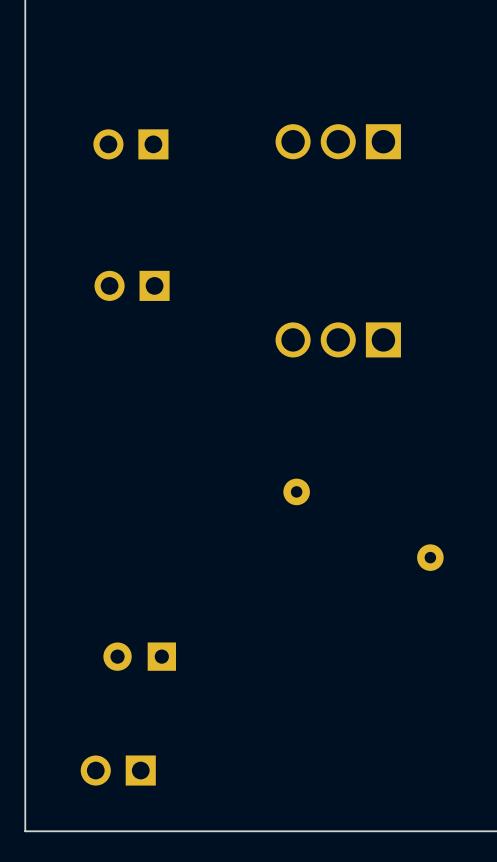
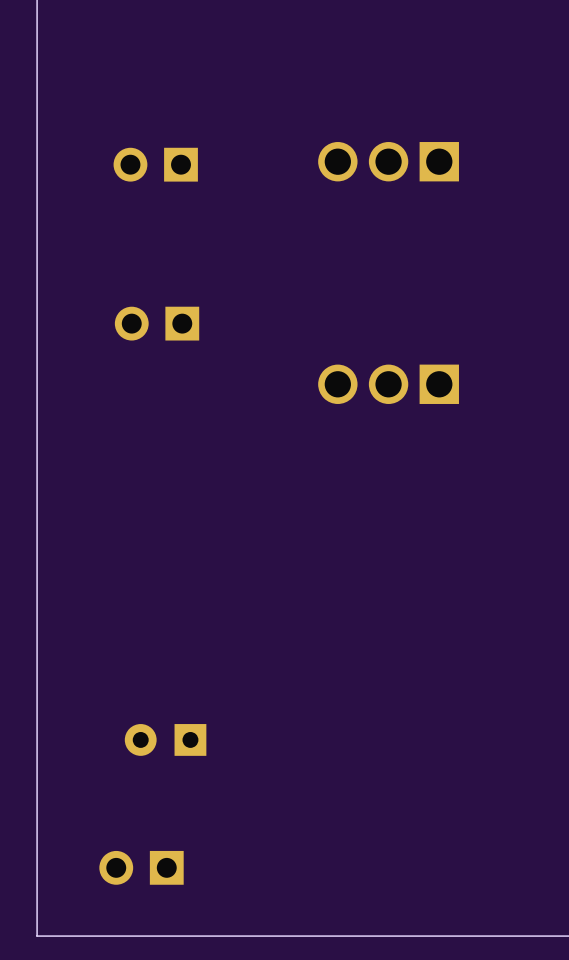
part: (296, 491) -> none
part: (430, 557) -> none

